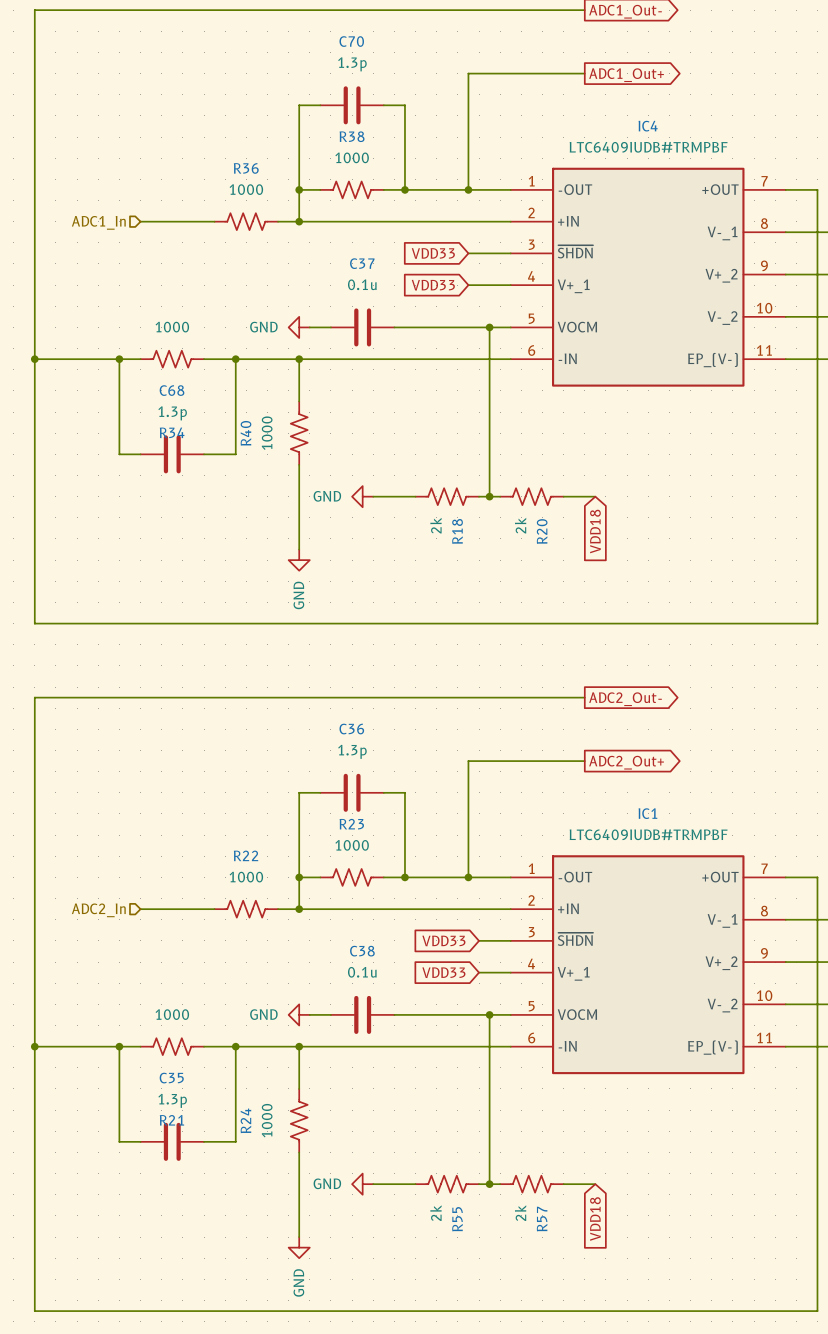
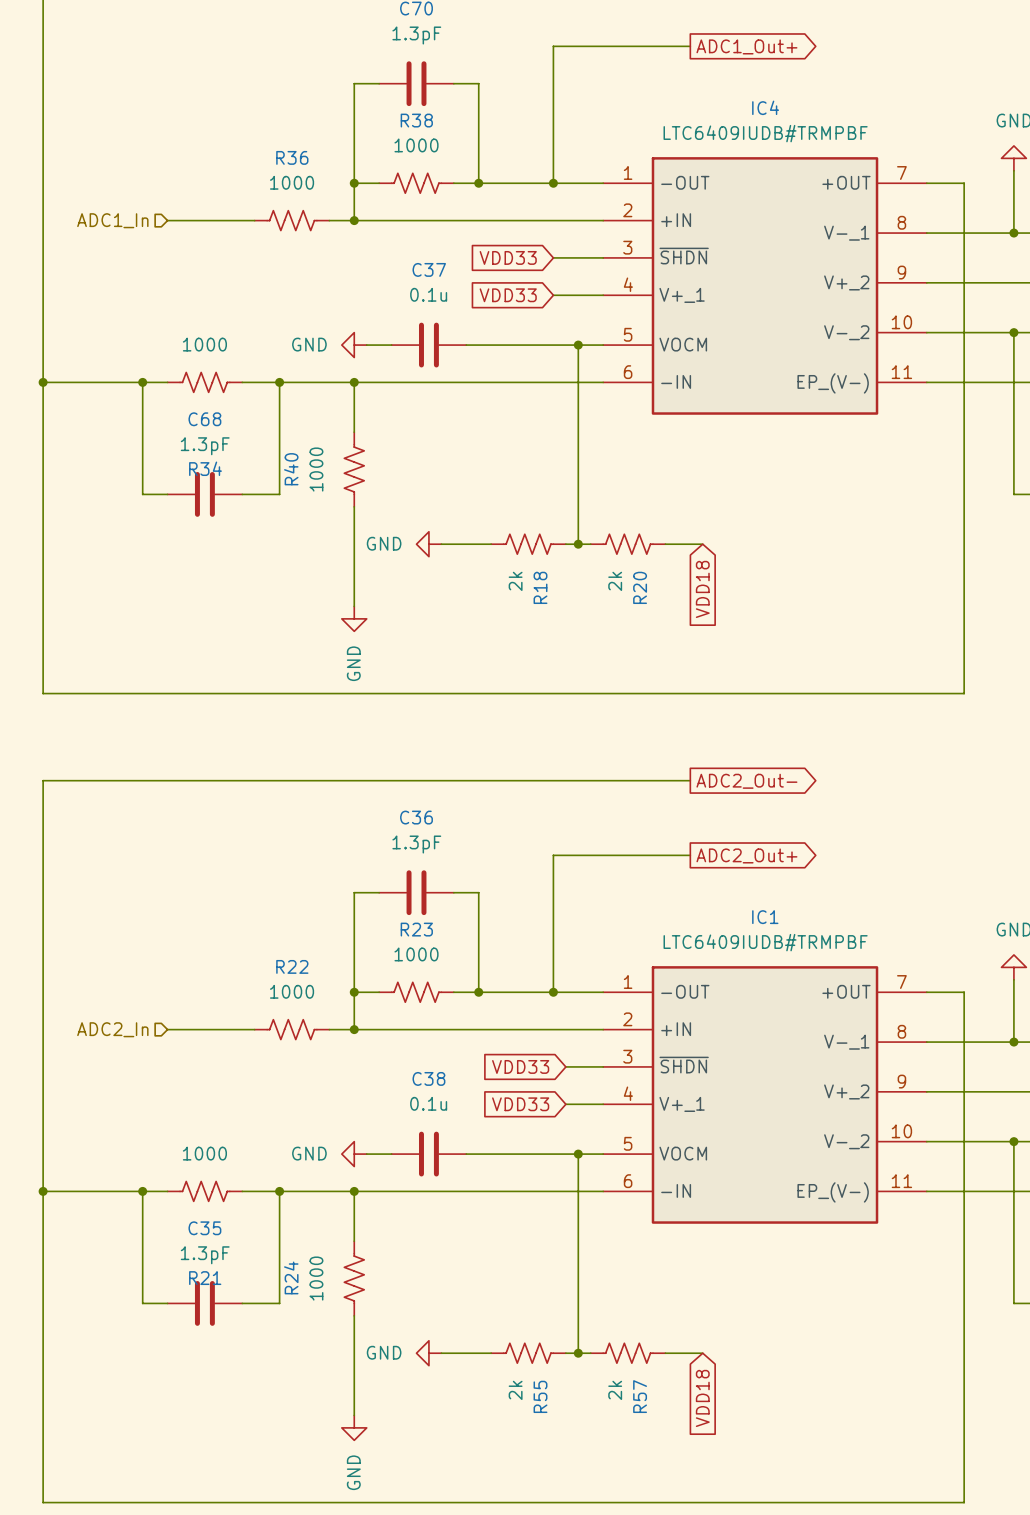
C70 value: 1.3p (352, 64) -> 1.3pF (416, 35)
C68 value: 1.3p (172, 413) -> 1.3pF (205, 446)
C36 value: 1.3p (352, 751) -> 1.3pF (416, 844)
C35 value: 1.3p (172, 1100) -> 1.3pF (205, 1255)

